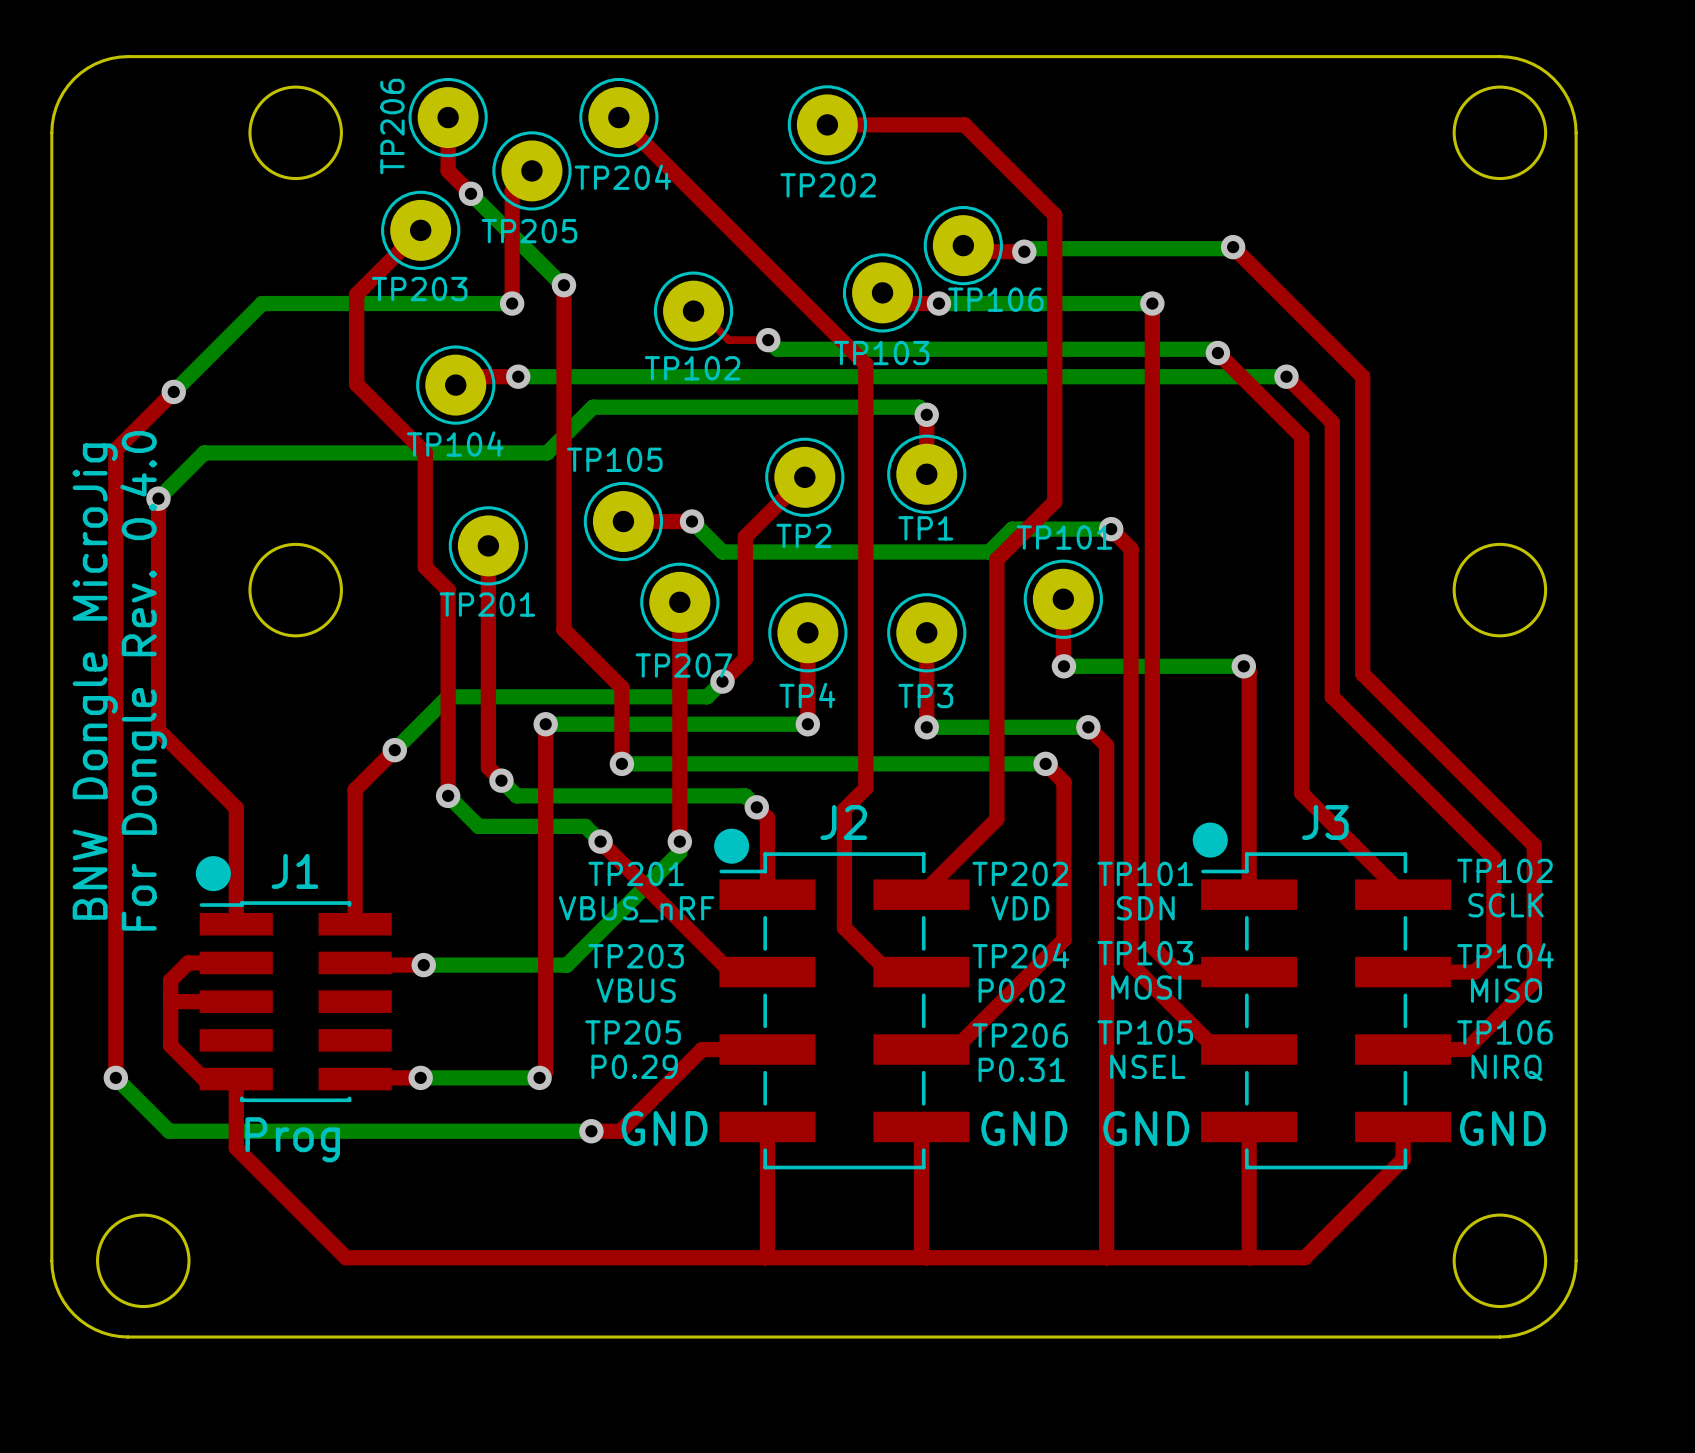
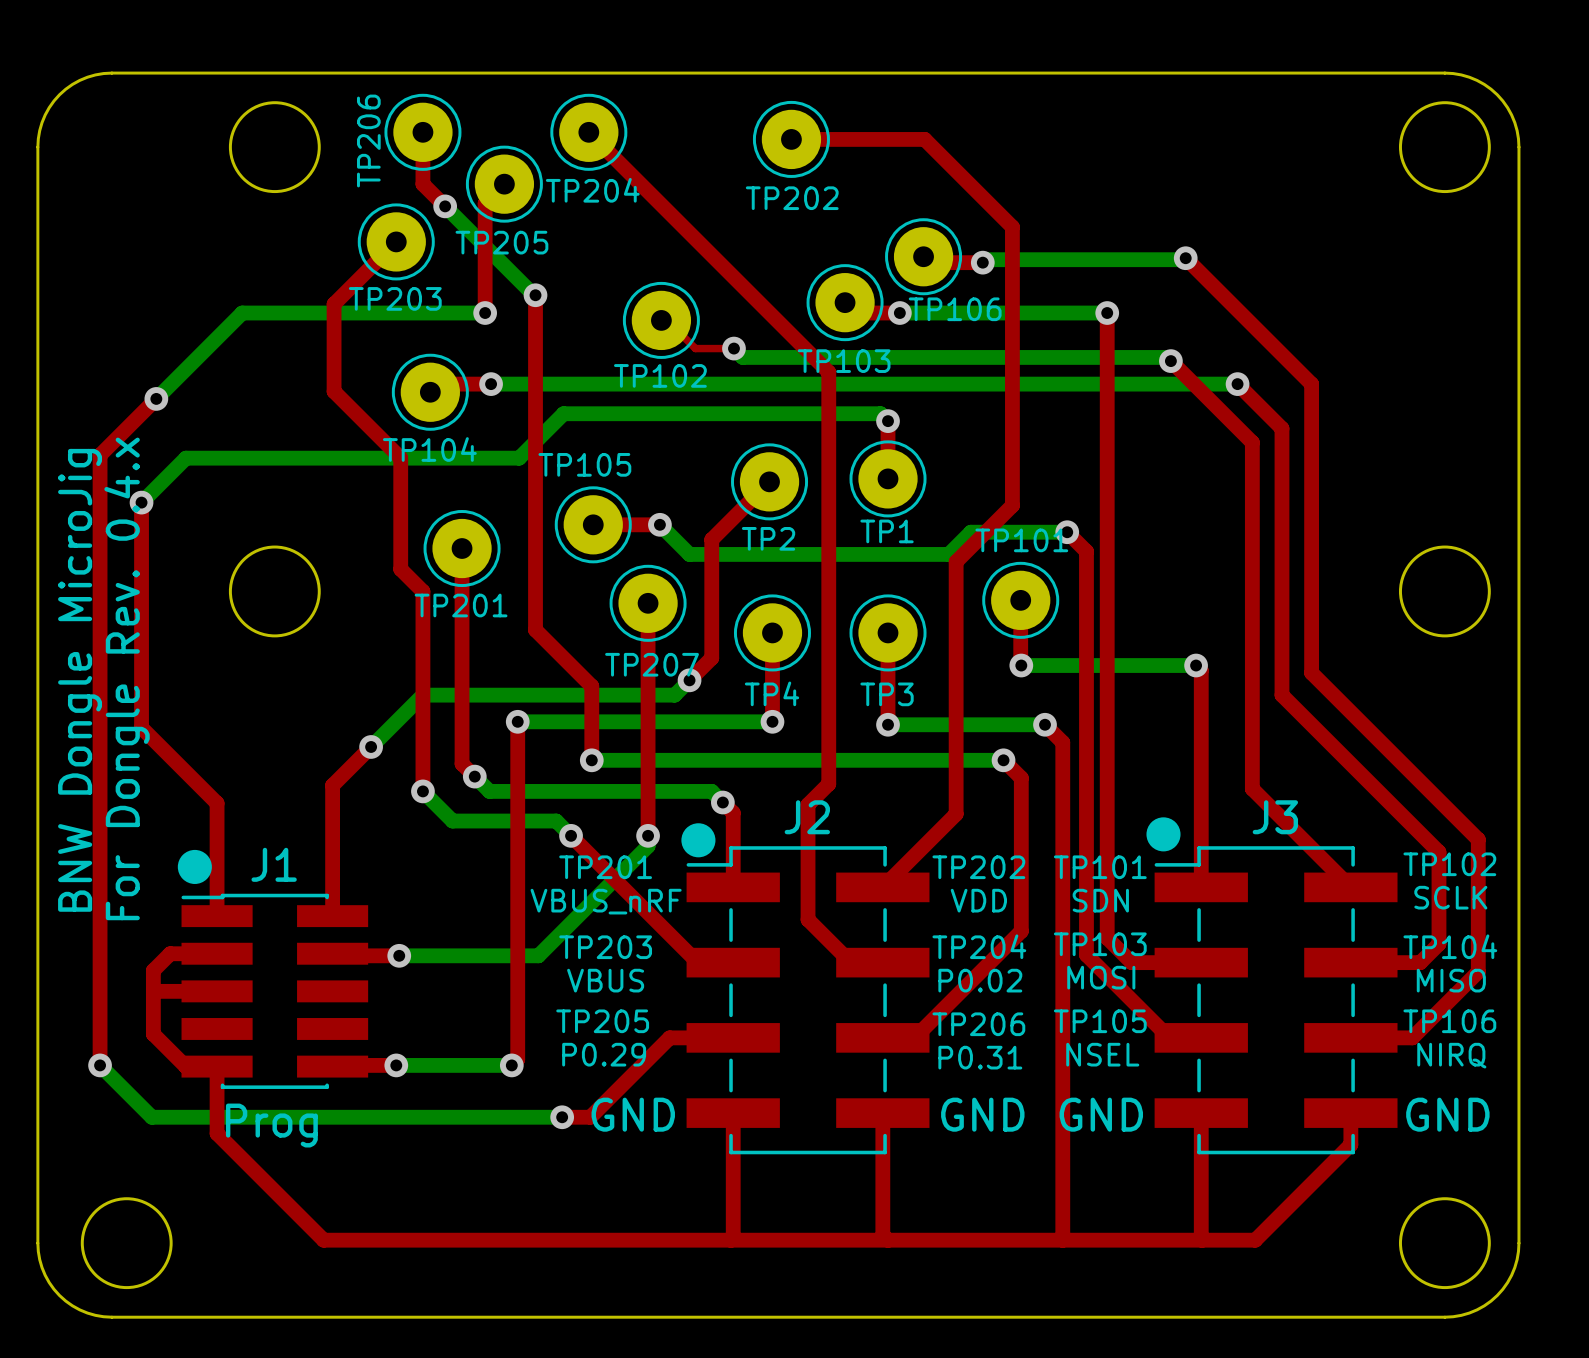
text: For Dongle Rev. 0.4.0 (143, 680) -> For Dongle Rev. 0.4.x (127, 678)

